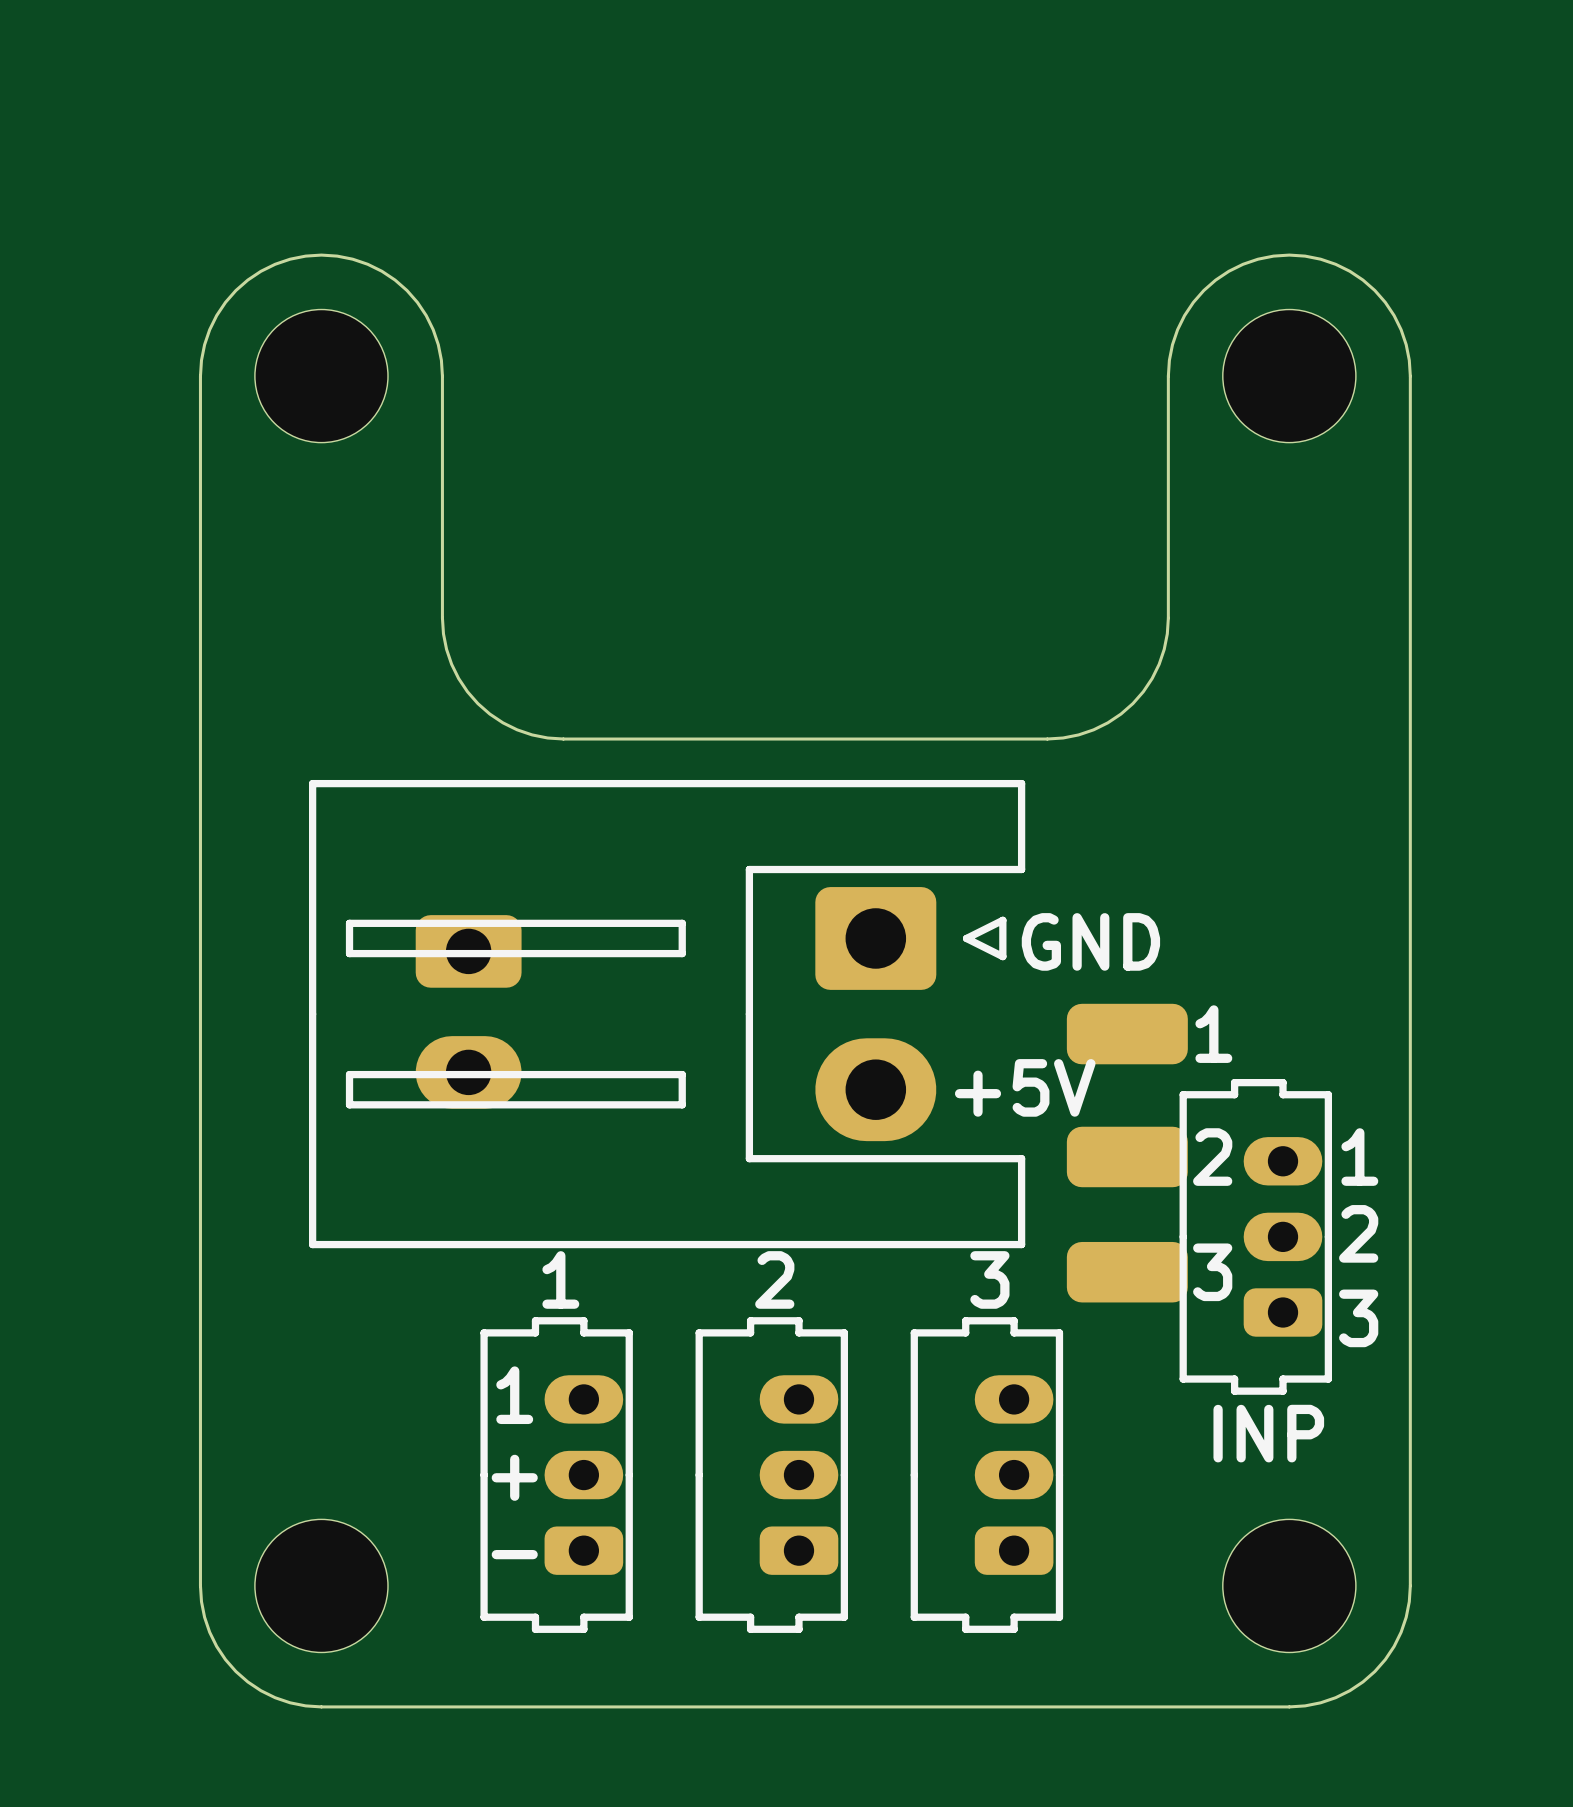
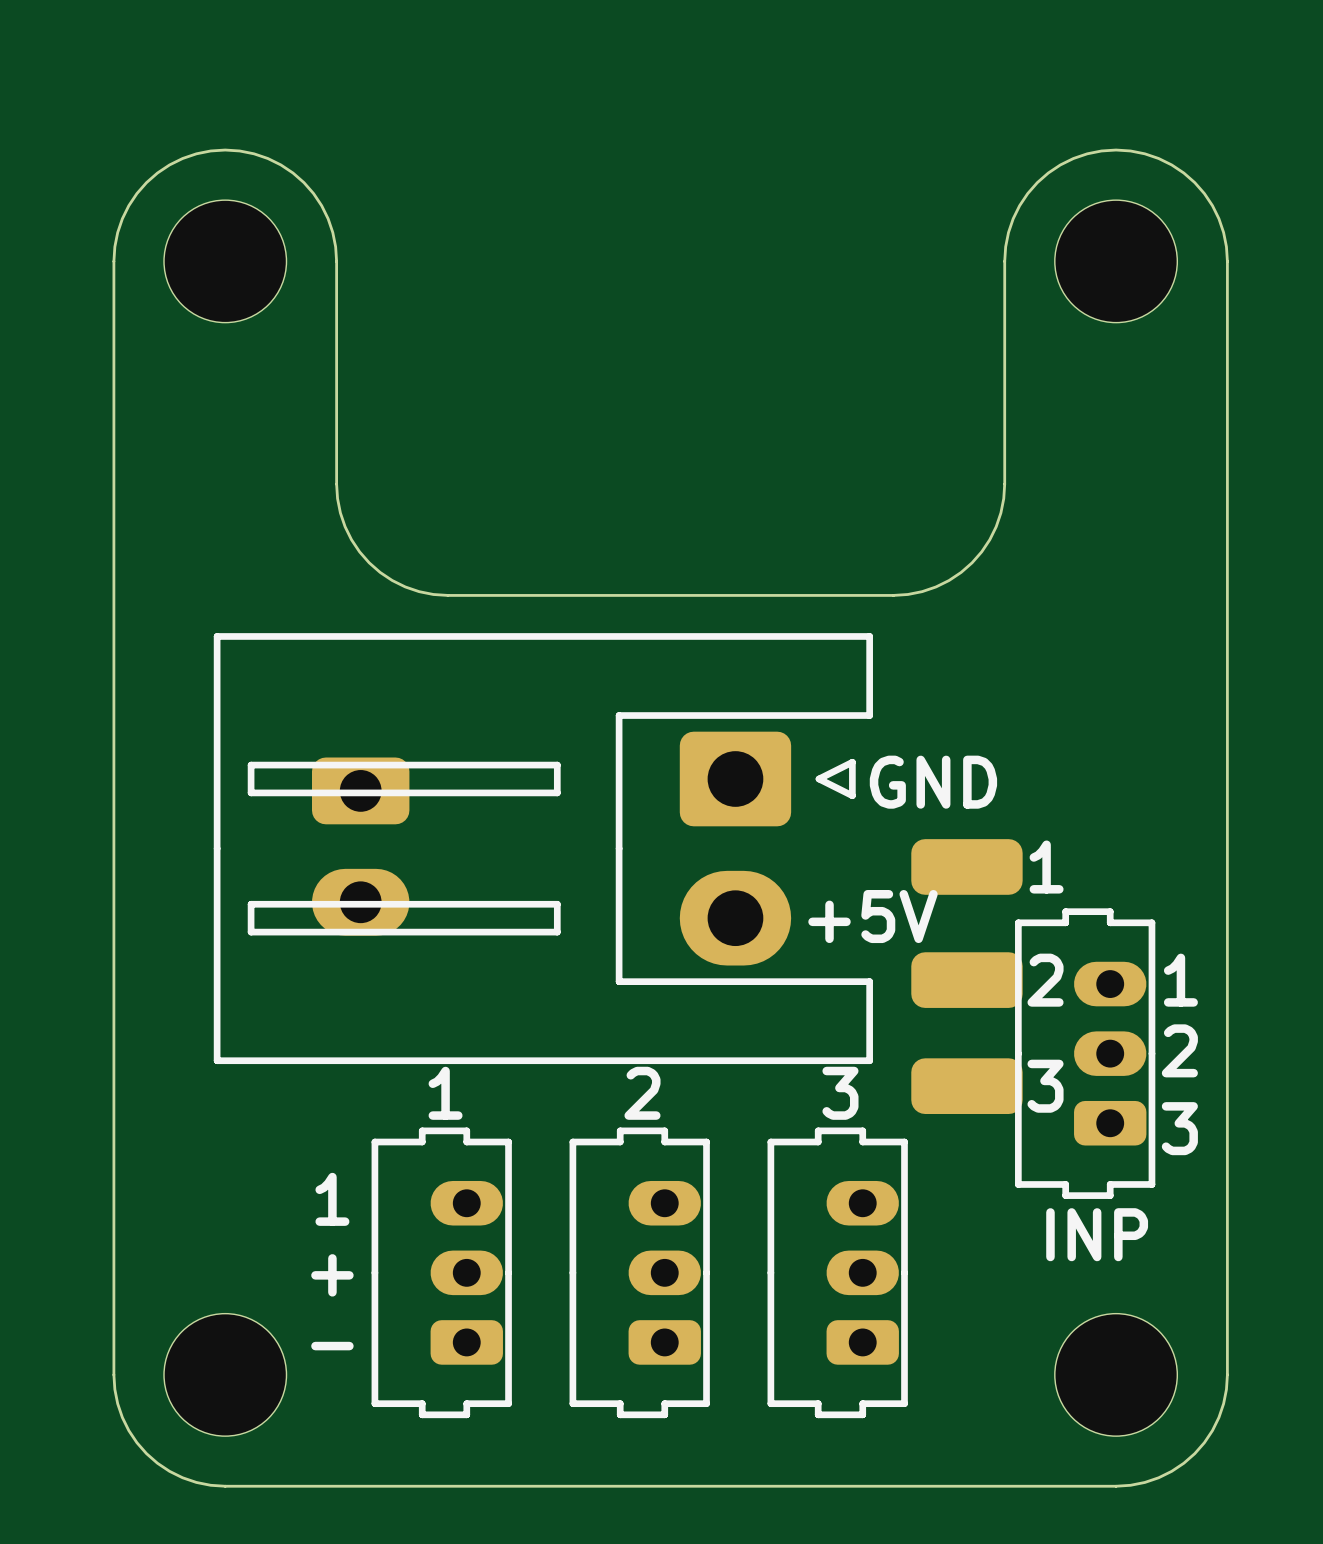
text position: 1 (514, 1395) -> 1 (332, 1199)
text position: + (514, 1477) -> + (332, 1275)
text position: - (514, 1554) -> - (332, 1346)

